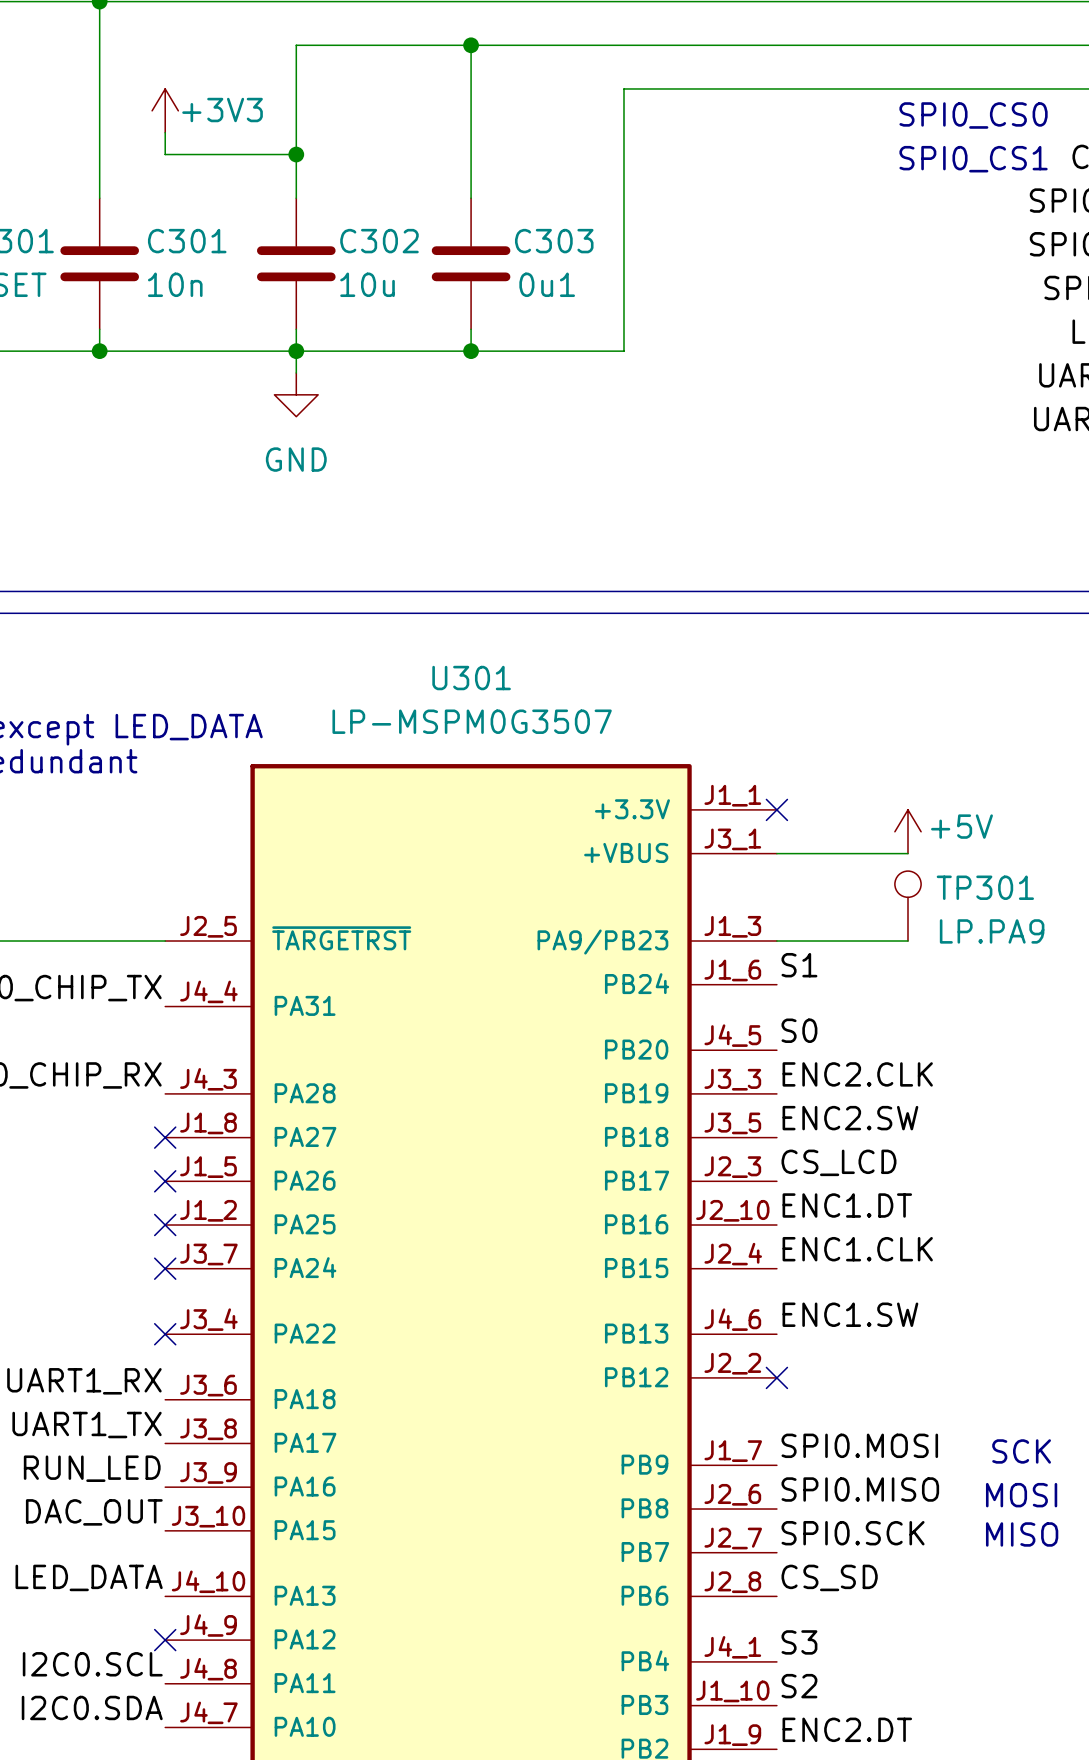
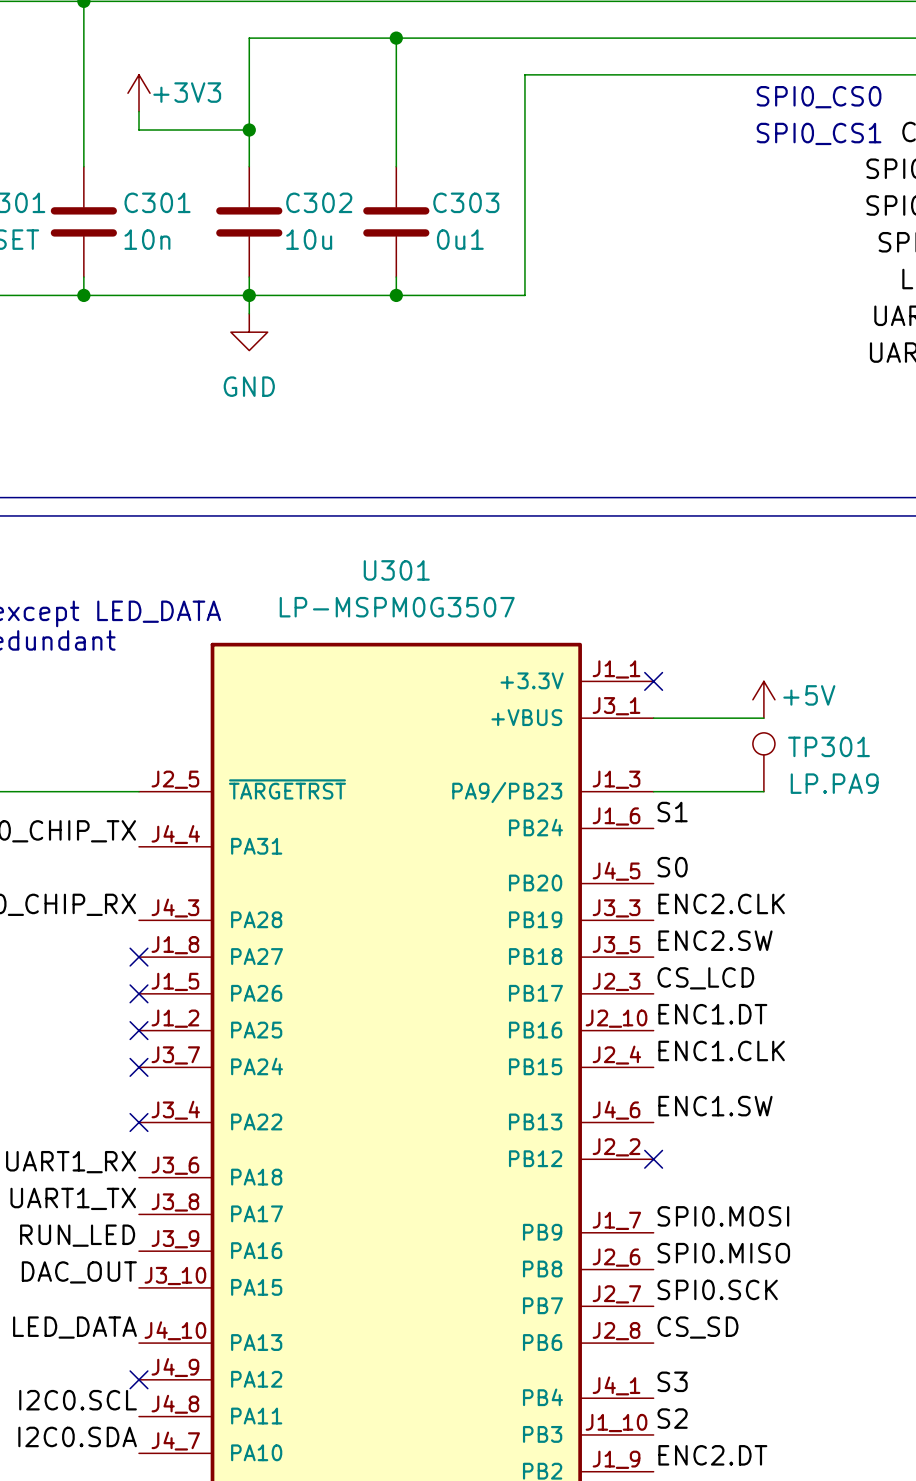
text: SCK (1021, 1451) -> none
text: MOSI (1021, 1495) -> none
text: MISO (1022, 1534) -> none

